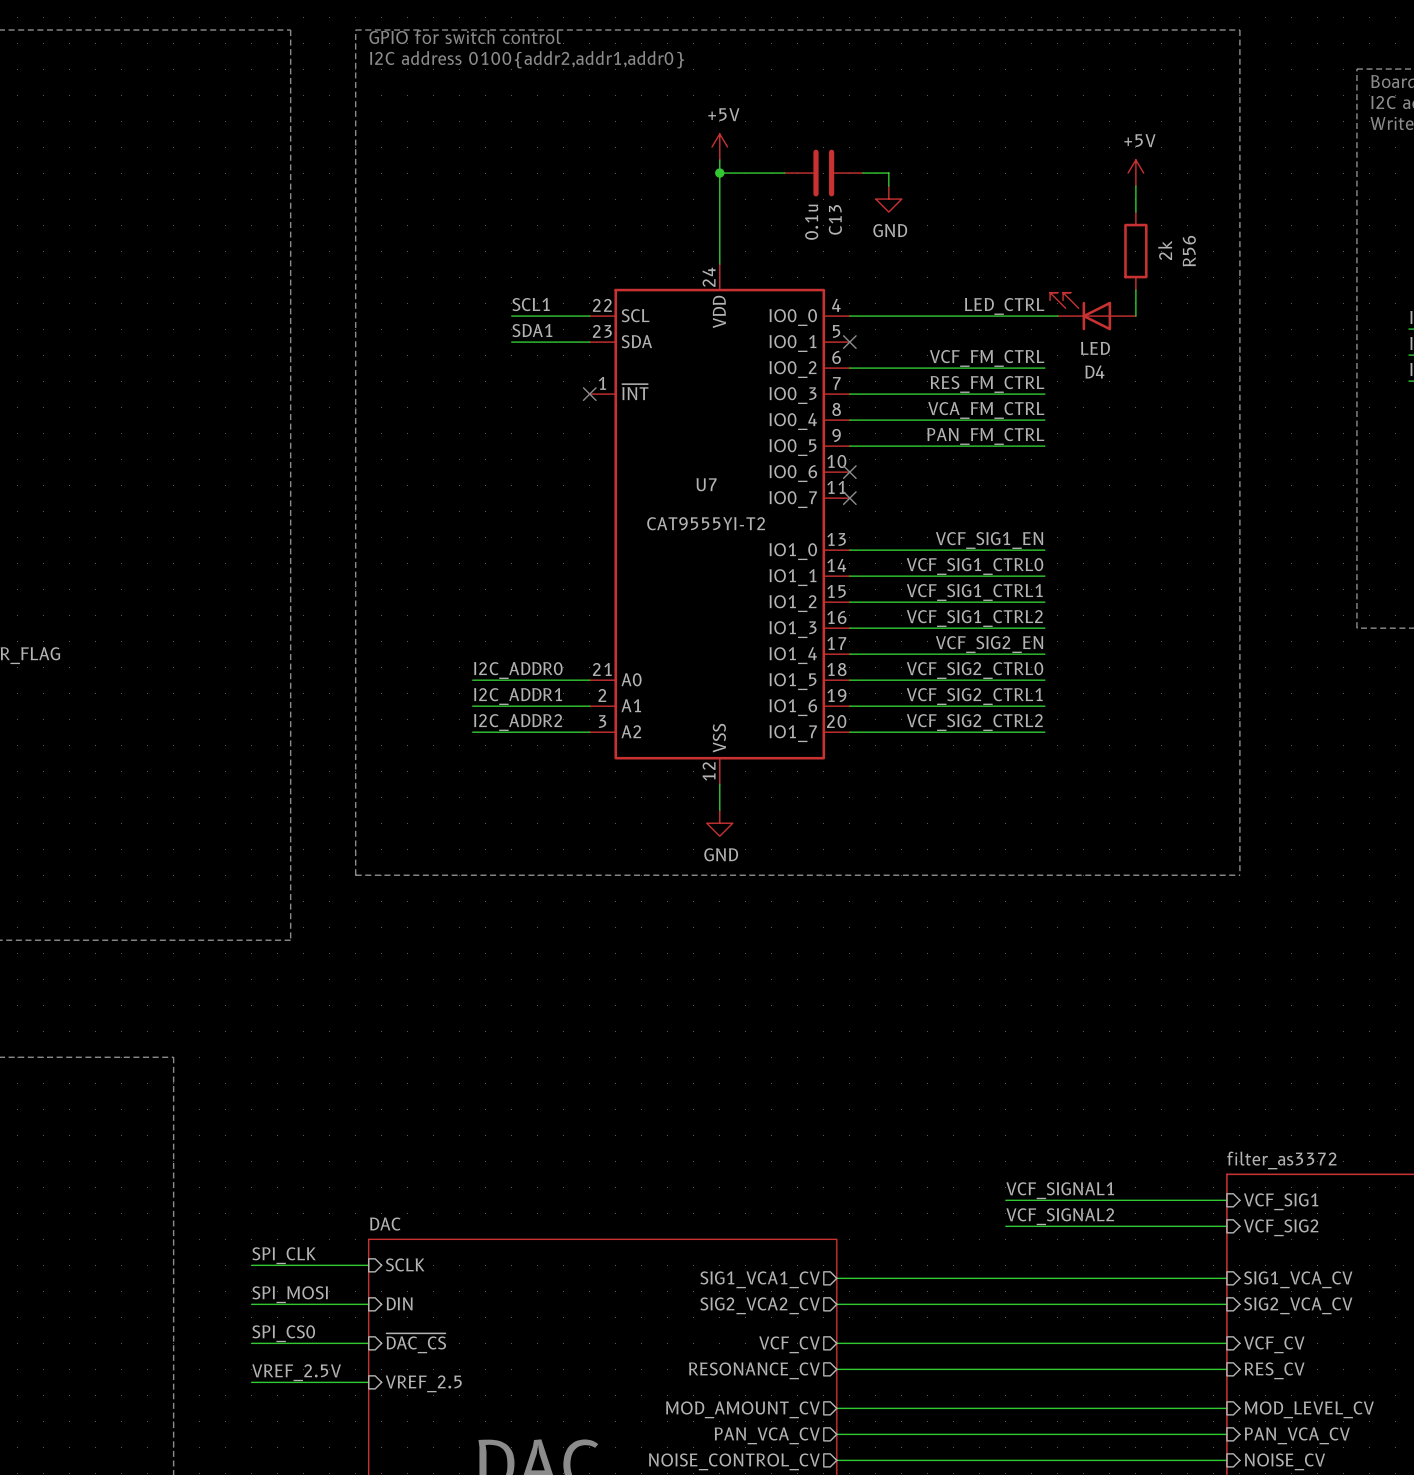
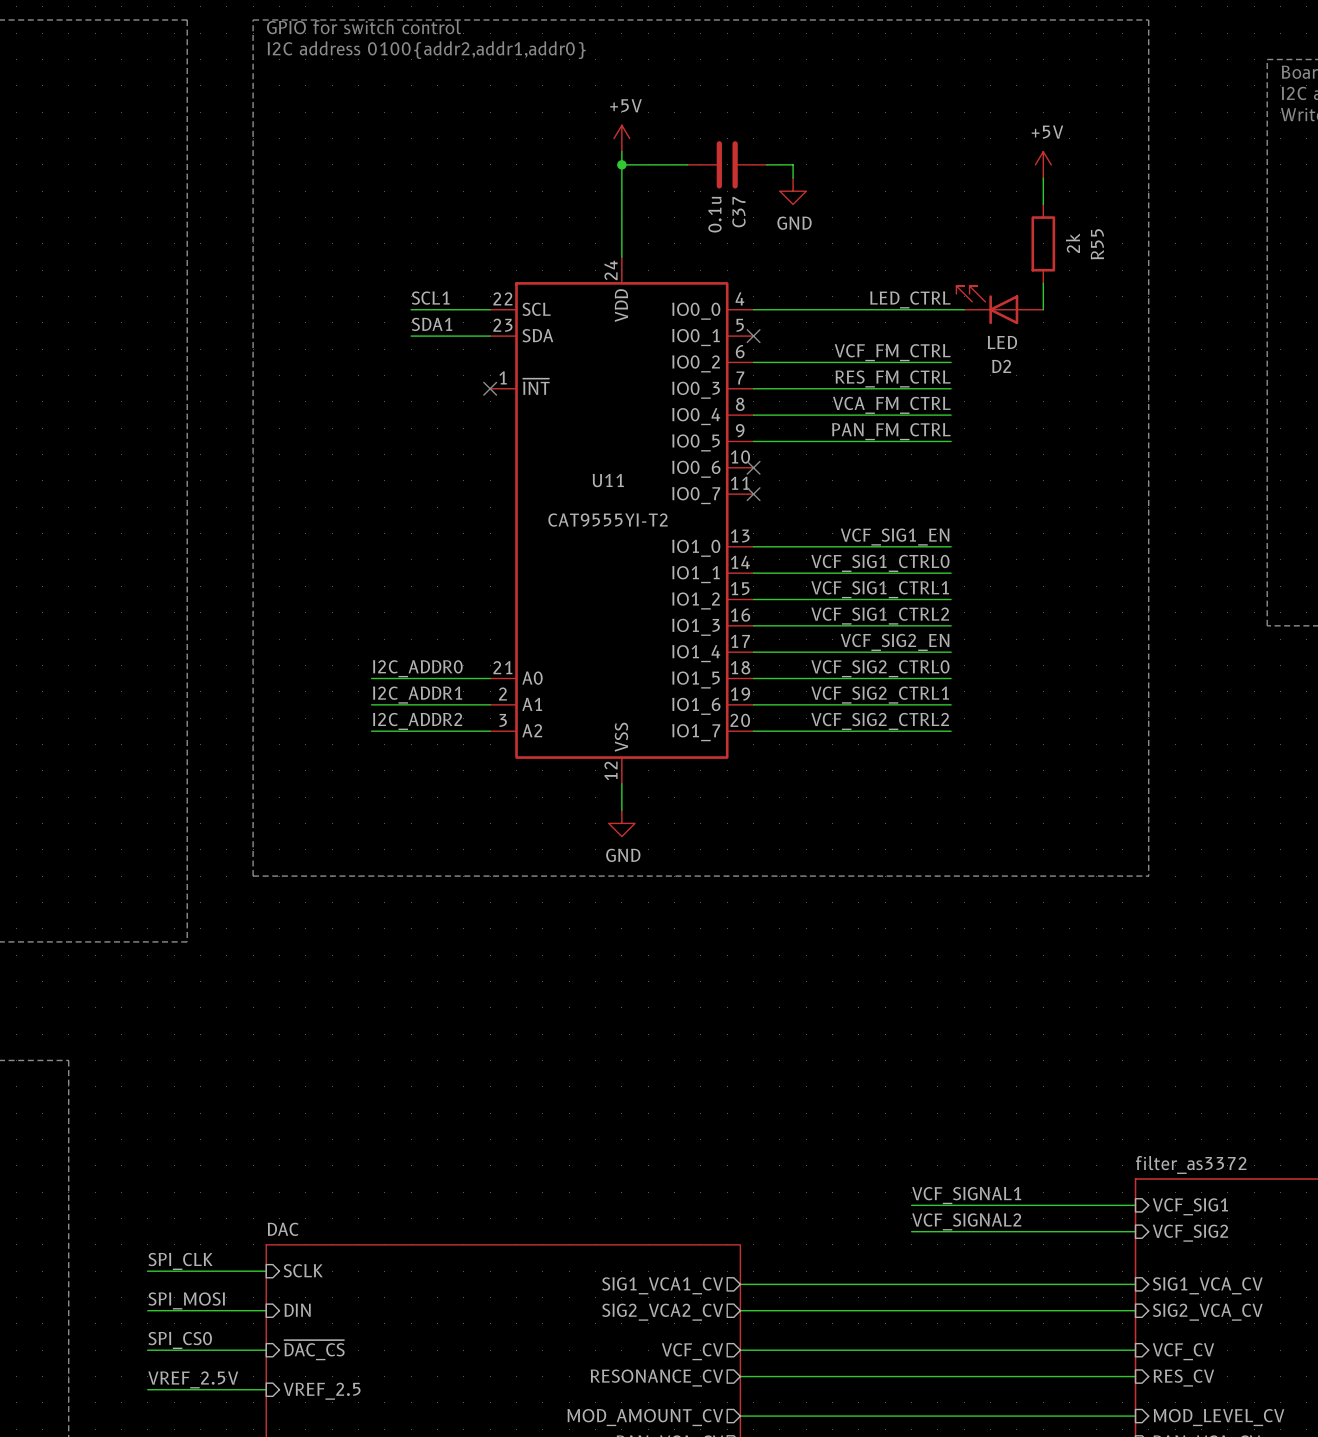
C13 name: C13 (835, 219) -> C37 (738, 212)
R56 name: R56 (1189, 251) -> R55 (1097, 244)
D4 name: D4 (1094, 372) -> D2 (1001, 366)
U7 name: U7 (706, 484) -> U11 (608, 480)

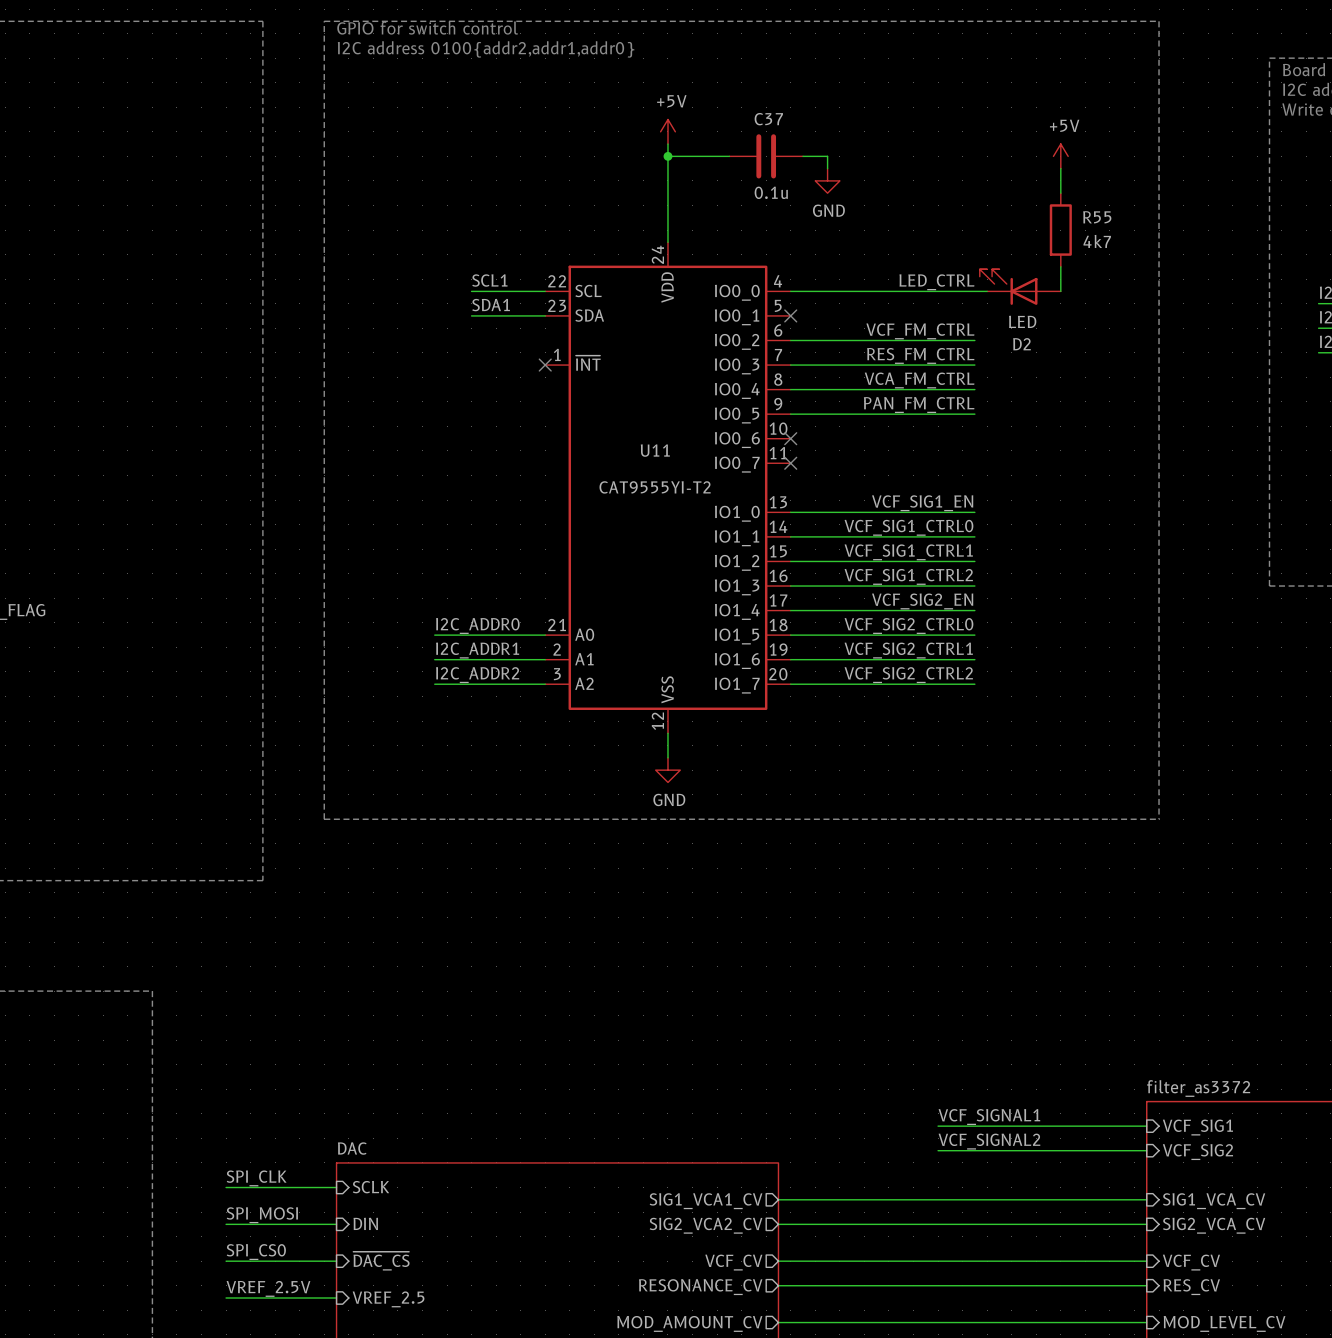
C37 name rotation: 0° (738, 212) -> 90° clockwise (768, 119)
C37 name position: C37 (738, 212) -> C37 (768, 119)
C37 value rotation: 0° (714, 214) -> 90° clockwise (771, 192)
R55 value: 2k (1072, 243) -> 4k7 (1097, 241)
R55 name rotation: 0° (1097, 244) -> 90° clockwise (1097, 217)

